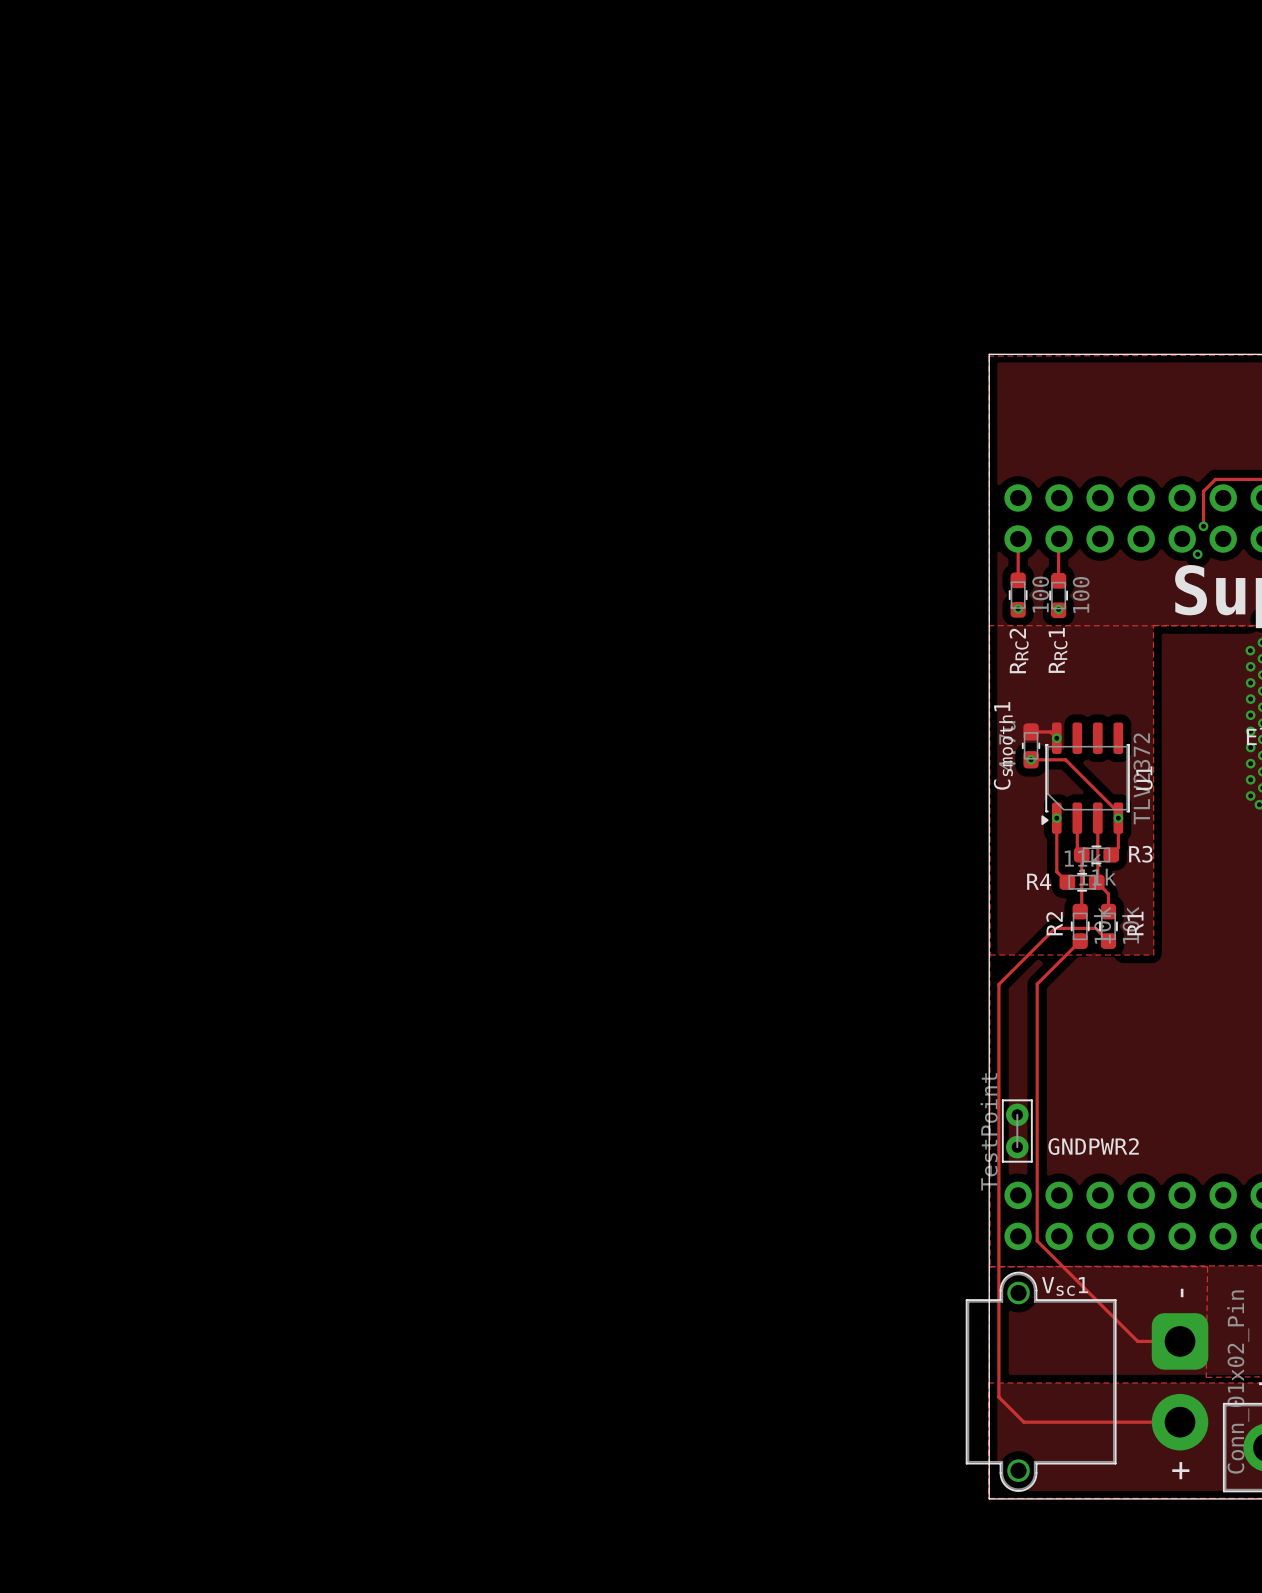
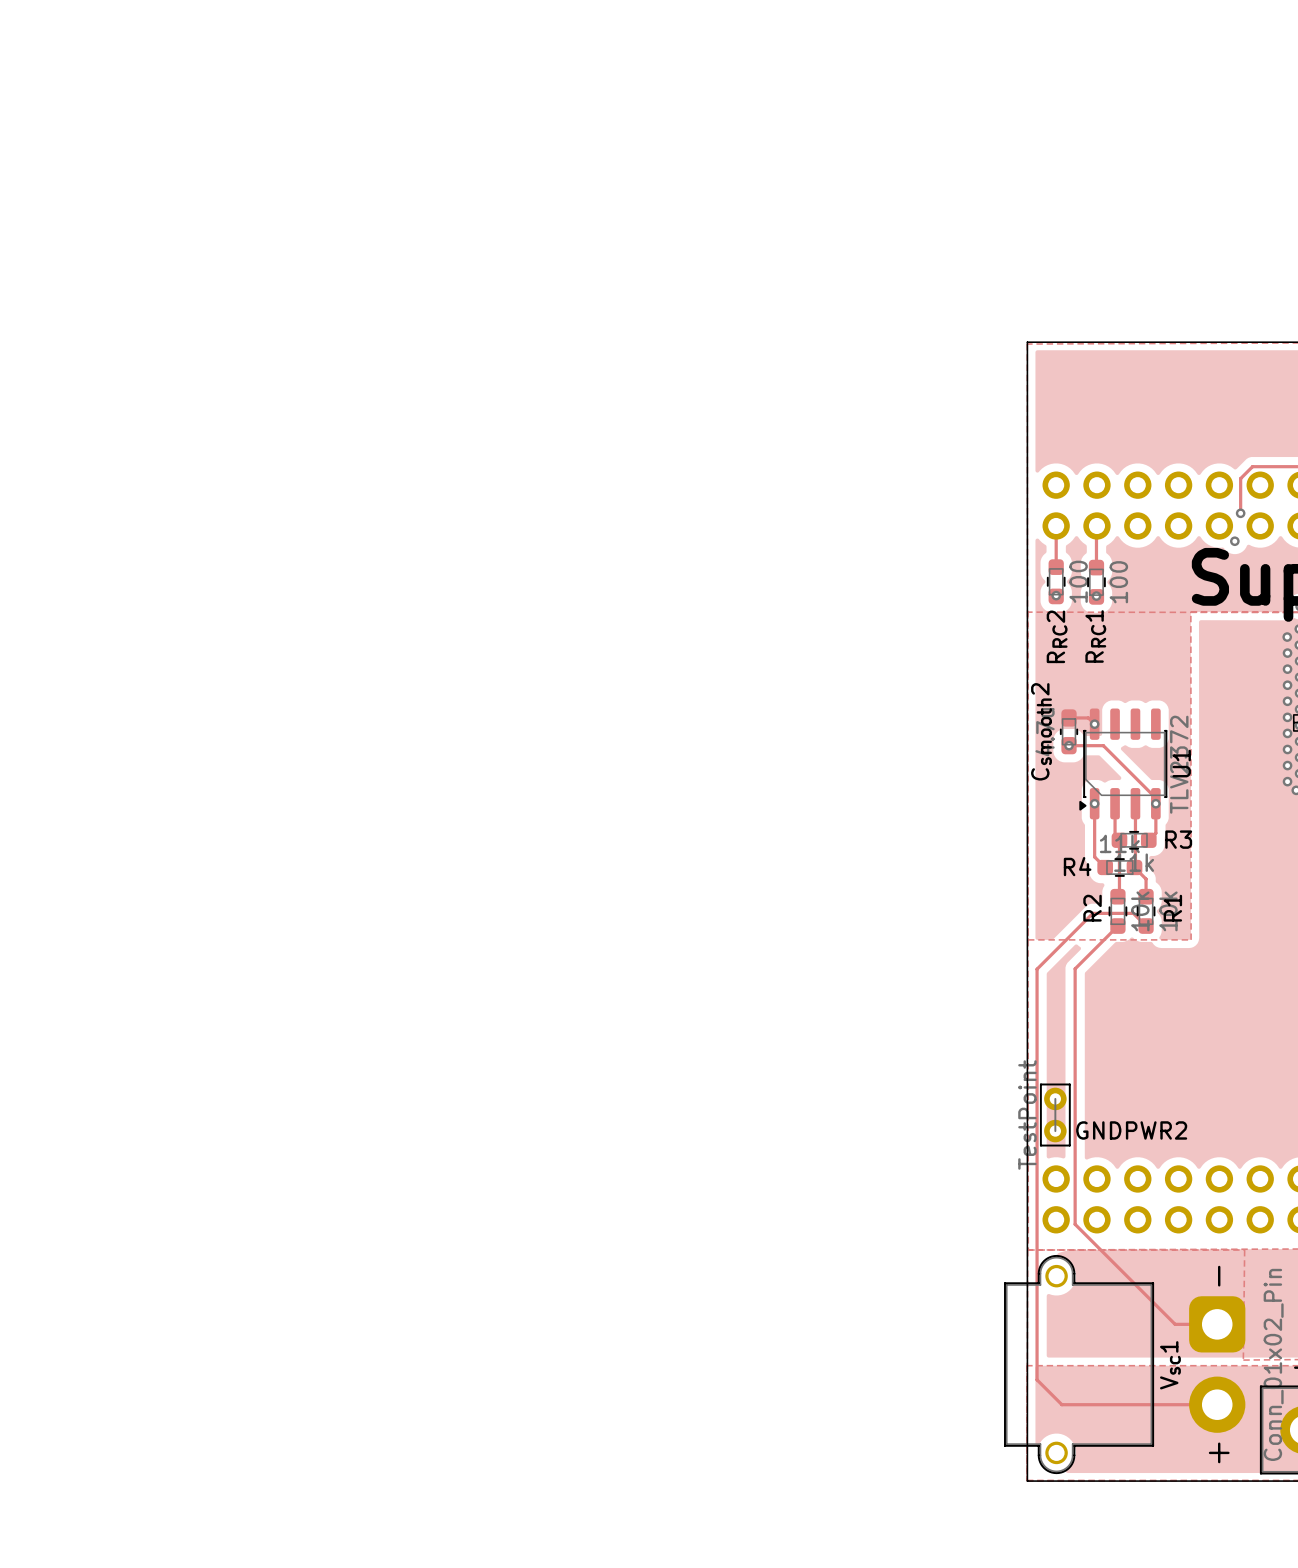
Csmooth1 name: Csmooth1 (1003, 745) -> Csmooth2 (1041, 731)
Vsc1 name rotation: 0° (1065, 1286) -> 90° counterclockwise (1170, 1365)
Vsc1 name position: Vsc1 (1065, 1286) -> Vsc1 (1170, 1365)

